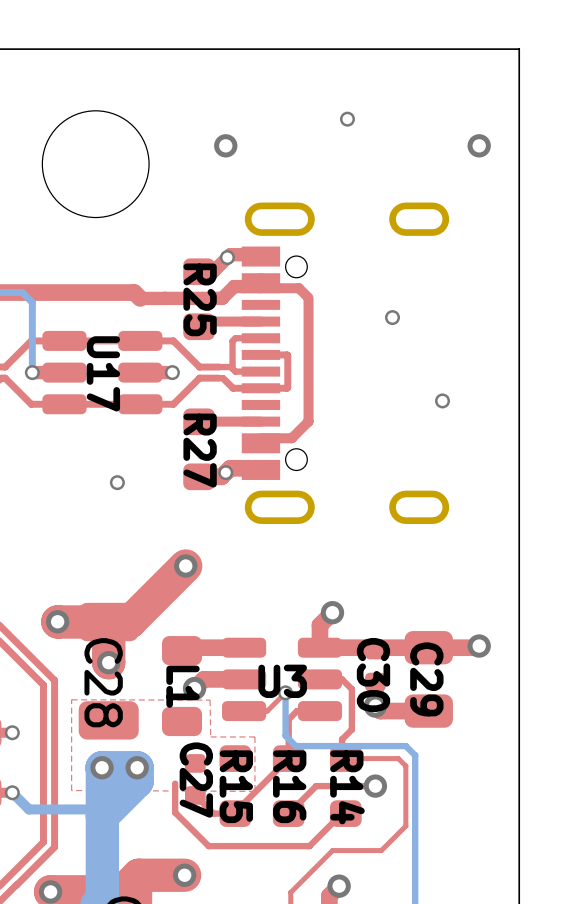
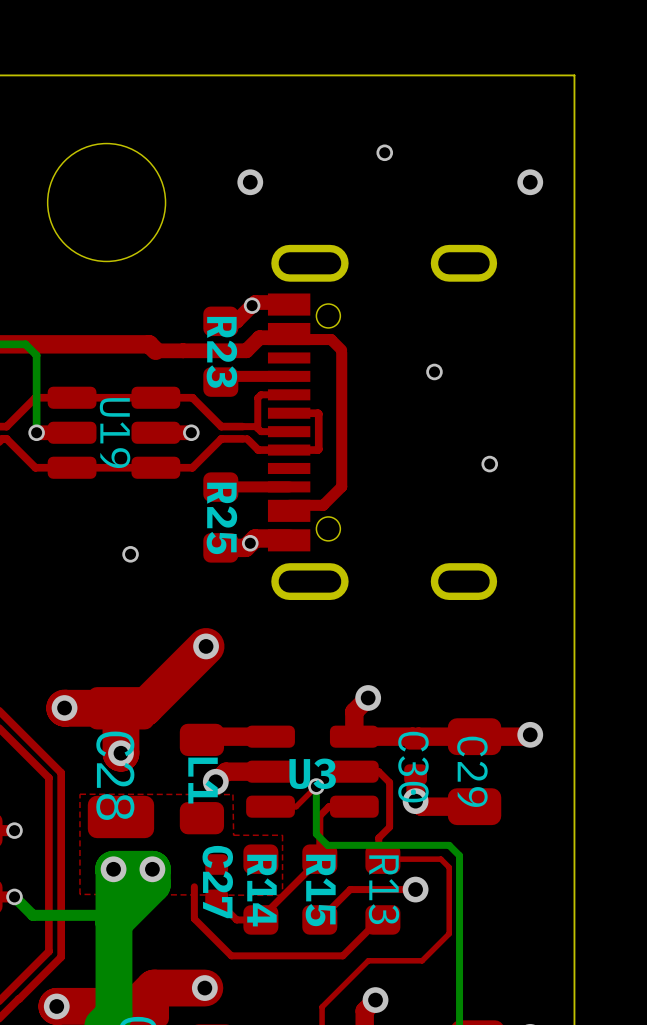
R25 name: R25 (200, 299) -> R23 (221, 352)
U17 name: U17 (103, 373) -> U19 (115, 433)
R27 name: R27 (200, 450) -> R25 (221, 518)
R15 name: R15 (236, 786) -> R14 (261, 890)
R16 name: R16 (289, 786) -> R15 (320, 890)
R14 name: R14 (347, 787) -> R13 (384, 889)

